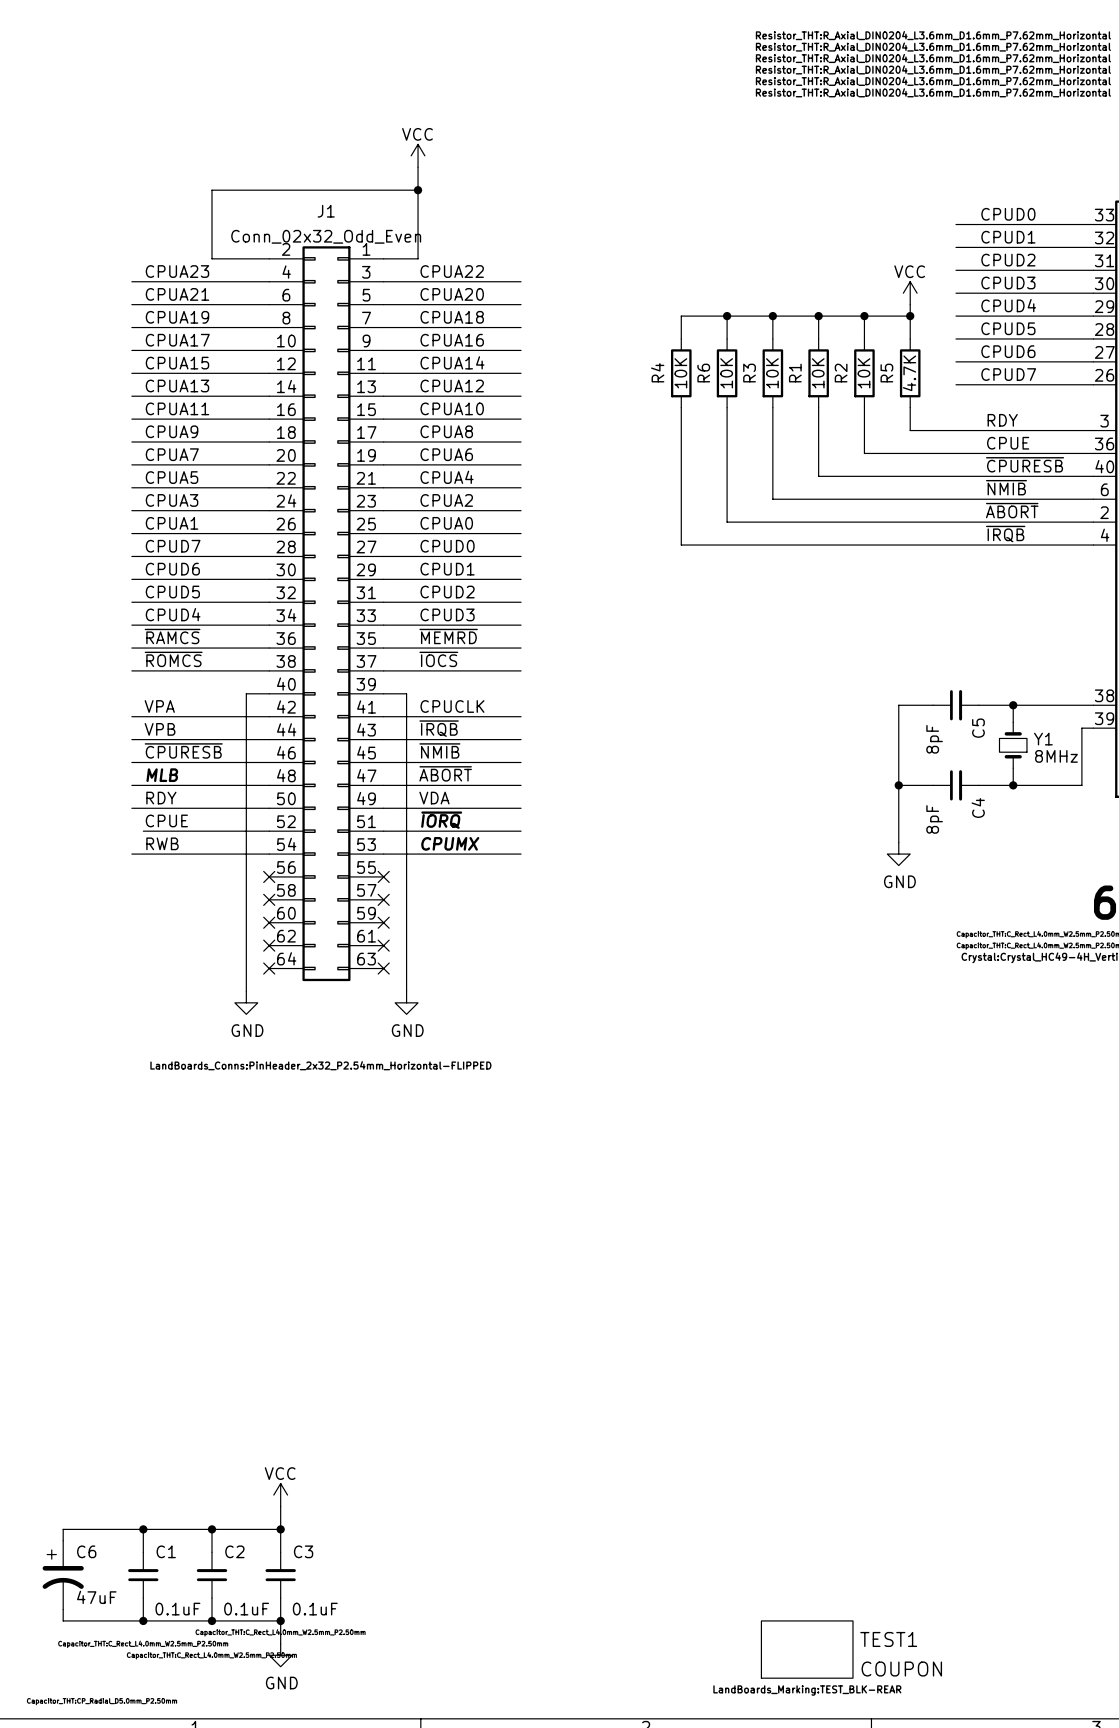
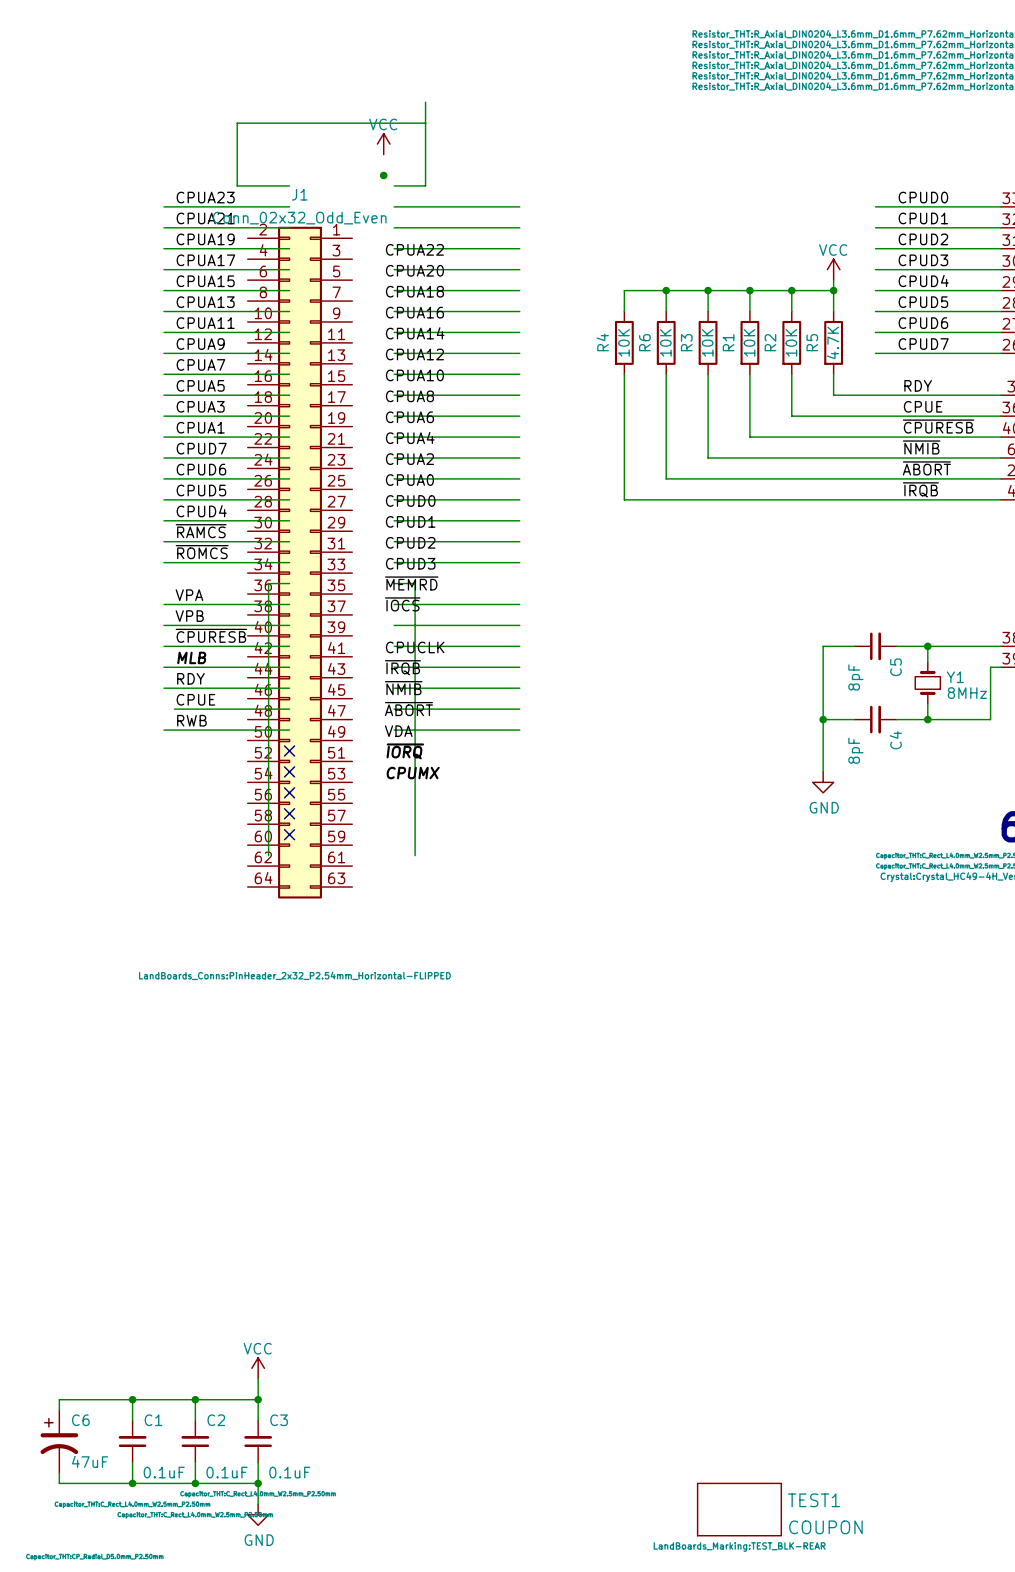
wire: (418, 167) (418, 258) (383, 258) -> (425, 102) (425, 185) (394, 185)
wire: (418, 190) (211, 190) (211, 258) (269, 258) -> (425, 123) (237, 123) (237, 185) (289, 185)
label position: CPUA23 (177, 271) -> CPUA23 (205, 197)
wire: (131, 281) (269, 281) -> (163, 206) (289, 206)
wire: (383, 281) (521, 281) -> (394, 206) (519, 206)
label position: CPUA21 (177, 294) -> CPUA21 (205, 218)
wire: (131, 304) (269, 304) -> (163, 227) (289, 227)
wire: (383, 304) (521, 304) -> (394, 227) (519, 227)
label position: CPUA19 (177, 317) -> CPUA19 (205, 239)
wire: (131, 327) (269, 327) -> (163, 248) (289, 248)
wire: (383, 327) (521, 327) -> (394, 248) (519, 248)
label position: CPUA17 (177, 340) -> CPUA17 (205, 260)
wire: (131, 350) (269, 350) -> (163, 269) (289, 269)
wire: (383, 350) (521, 350) -> (394, 269) (519, 269)
label position: CPUA15 (177, 363) -> CPUA15 (205, 281)
wire: (131, 373) (269, 373) -> (163, 290) (289, 290)
wire: (383, 373) (521, 373) -> (394, 290) (519, 290)
label position: CPUA13 (177, 386) -> CPUA13 (205, 302)
wire: (131, 396) (269, 396) -> (163, 311) (289, 311)
wire: (383, 396) (521, 396) -> (394, 311) (519, 311)
label position: CPUA11 (177, 408) -> CPUA11 (205, 323)
wire: (131, 419) (269, 419) -> (163, 332) (289, 332)
wire: (383, 419) (521, 419) -> (394, 332) (519, 332)
label position: CPUA9 (172, 431) -> CPUA9 (200, 344)
wire: (131, 441) (269, 441) -> (163, 353) (289, 353)
wire: (383, 441) (521, 441) -> (394, 353) (519, 353)
label position: CPUA7 (172, 454) -> CPUA7 (200, 364)
wire: (131, 464) (269, 464) -> (163, 374) (289, 374)
wire: (383, 464) (521, 464) -> (394, 374) (519, 374)
label position: CPUA5 (172, 477) -> CPUA5 (200, 385)
wire: (131, 487) (269, 487) -> (163, 395) (289, 395)
wire: (383, 487) (521, 487) -> (394, 395) (519, 395)
label position: CPUA3 (172, 500) -> CPUA3 (200, 406)
wire: (131, 510) (269, 510) -> (163, 416) (289, 416)
wire: (383, 510) (521, 510) -> (394, 416) (519, 416)
label position: CPUA1 (172, 523) -> CPUA1 (200, 427)
wire: (131, 533) (269, 533) -> (163, 437) (289, 437)
wire: (383, 533) (521, 533) -> (394, 437) (519, 437)
label position: CPUD7 (173, 546) -> CPUD7 (201, 448)
wire: (131, 556) (269, 556) -> (163, 458) (289, 458)
wire: (383, 556) (521, 556) -> (394, 458) (519, 458)
label position: CPUD6 (172, 569) -> CPUD6 (201, 469)
wire: (131, 579) (269, 579) -> (163, 478) (289, 478)
wire: (383, 579) (521, 579) -> (394, 478) (519, 478)
label position: CPUD5 (172, 592) -> CPUD5 (201, 490)
wire: (131, 602) (269, 602) -> (163, 499) (289, 499)
wire: (383, 602) (521, 602) -> (394, 499) (519, 499)
label position: CPUD4 (173, 614) -> CPUD4 (201, 511)
wire: (131, 625) (269, 625) -> (163, 520) (289, 520)
wire: (383, 625) (521, 625) -> (394, 520) (519, 520)
label position: ~{RAMCS} (172, 636) -> ~{RAMCS} (201, 531)
wire: (131, 648) (269, 648) -> (163, 541) (289, 541)
wire: (383, 648) (521, 648) -> (394, 541) (519, 541)
label position: ~{ROMCS} (173, 659) -> ~{ROMCS} (202, 552)
wire: (131, 670) (269, 670) -> (163, 562) (289, 562)
wire: (383, 670) (521, 670) -> (394, 562) (519, 562)
wire: (269, 693) (246, 693) (246, 991) -> (289, 583) (268, 583) (268, 855)
wire: (383, 693) (406, 693) (406, 991) -> (394, 583) (415, 583) (415, 855)
label position: VPA (159, 706) -> VPA (189, 595)
wire: (131, 716) (269, 716) -> (163, 604) (289, 604)
wire: (383, 716) (521, 716) -> (394, 604) (519, 604)
label position: VPB (160, 729) -> VPB (189, 616)
wire: (131, 739) (269, 739) -> (163, 625) (289, 625)
wire: (383, 739) (521, 739) -> (394, 625) (519, 625)
label position: ~{CPURESB} (183, 750) -> ~{CPURESB} (211, 635)
wire: (131, 762) (269, 762) -> (163, 646) (289, 646)
wire: (383, 762) (521, 762) -> (394, 646) (519, 646)
label position: MLB (162, 775) -> MLB (191, 657)
wire: (131, 785) (269, 785) -> (163, 667) (289, 667)
wire: (383, 785) (521, 785) -> (394, 667) (519, 667)
label position: RDY (161, 798) -> RDY (190, 678)
wire: (131, 808) (269, 808) -> (163, 688) (289, 688)
wire: (383, 808) (521, 808) -> (394, 688) (519, 688)
no-connect mark: none -> (289, 750)
label position: CPUE (166, 820) -> CPUE (195, 699)
wire: (143, 831) (269, 831) -> (174, 709) (289, 709)
wire: (383, 831) (521, 831) -> (394, 709) (519, 709)
no-connect mark: none -> (289, 771)
label position: RWB (162, 843) -> RWB (191, 720)
wire: (131, 854) (269, 854) -> (163, 730) (289, 730)
wire: (383, 854) (521, 854) -> (394, 730) (519, 730)
no-connect mark: none -> (289, 792)
no-connect mark: (269, 876) -> none
no-connect mark: (383, 876) -> none
no-connect mark: none -> (289, 813)
no-connect mark: (269, 899) -> none
no-connect mark: (383, 899) -> none
no-connect mark: none -> (289, 834)
no-connect mark: (269, 922) -> none
no-connect mark: (383, 922) -> none
no-connect mark: (269, 945) -> none
no-connect mark: (383, 945) -> none
no-connect mark: (269, 968) -> none
no-connect mark: (383, 968) -> none
power symbol: GND (246, 1002) -> none
power symbol: GND (406, 1002) -> none

